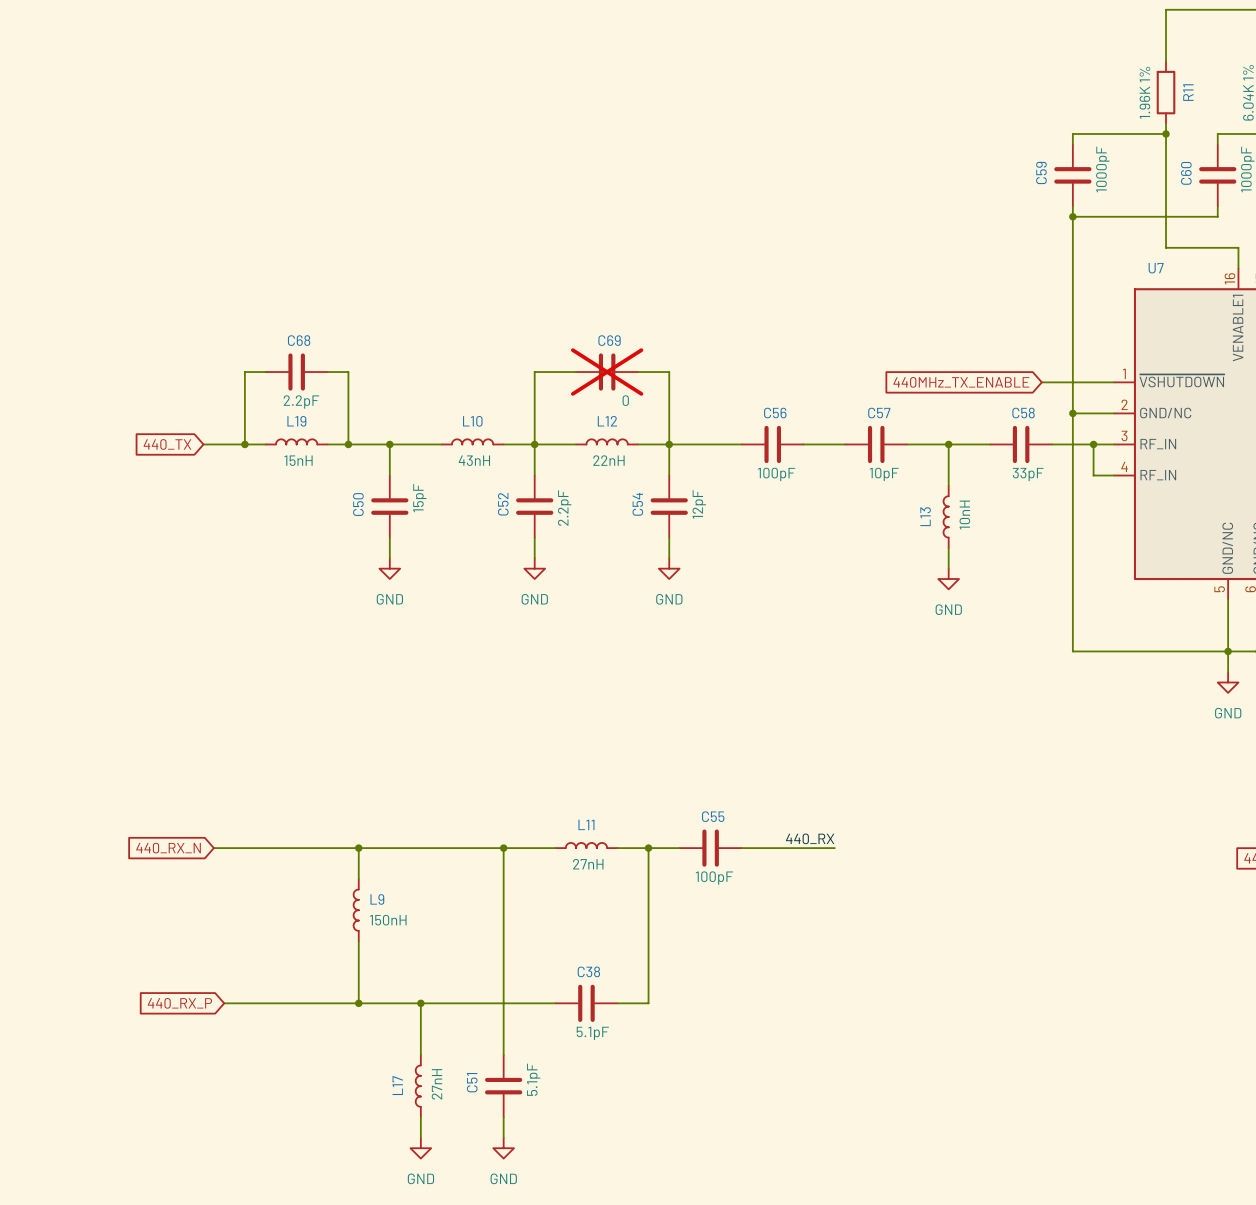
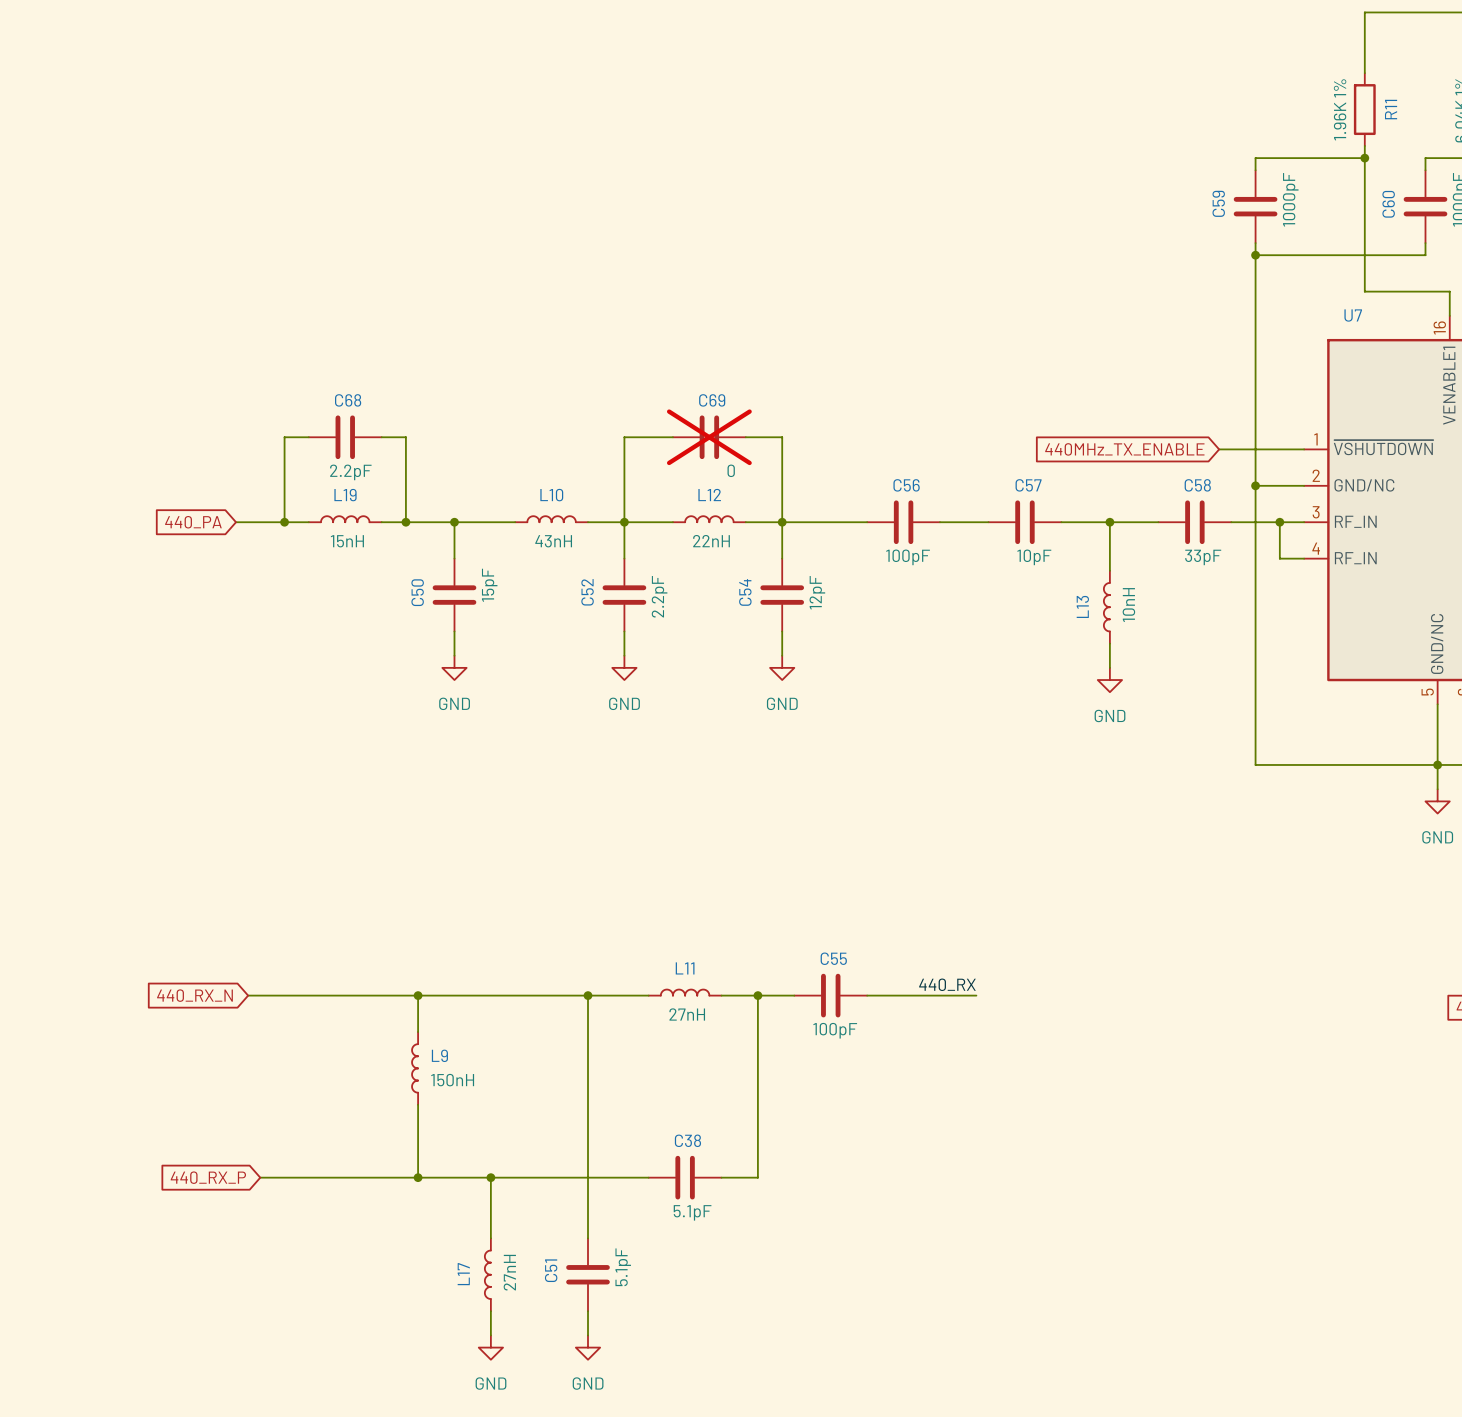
global label: 440_TX (167, 444) -> 440_PA (193, 522)

